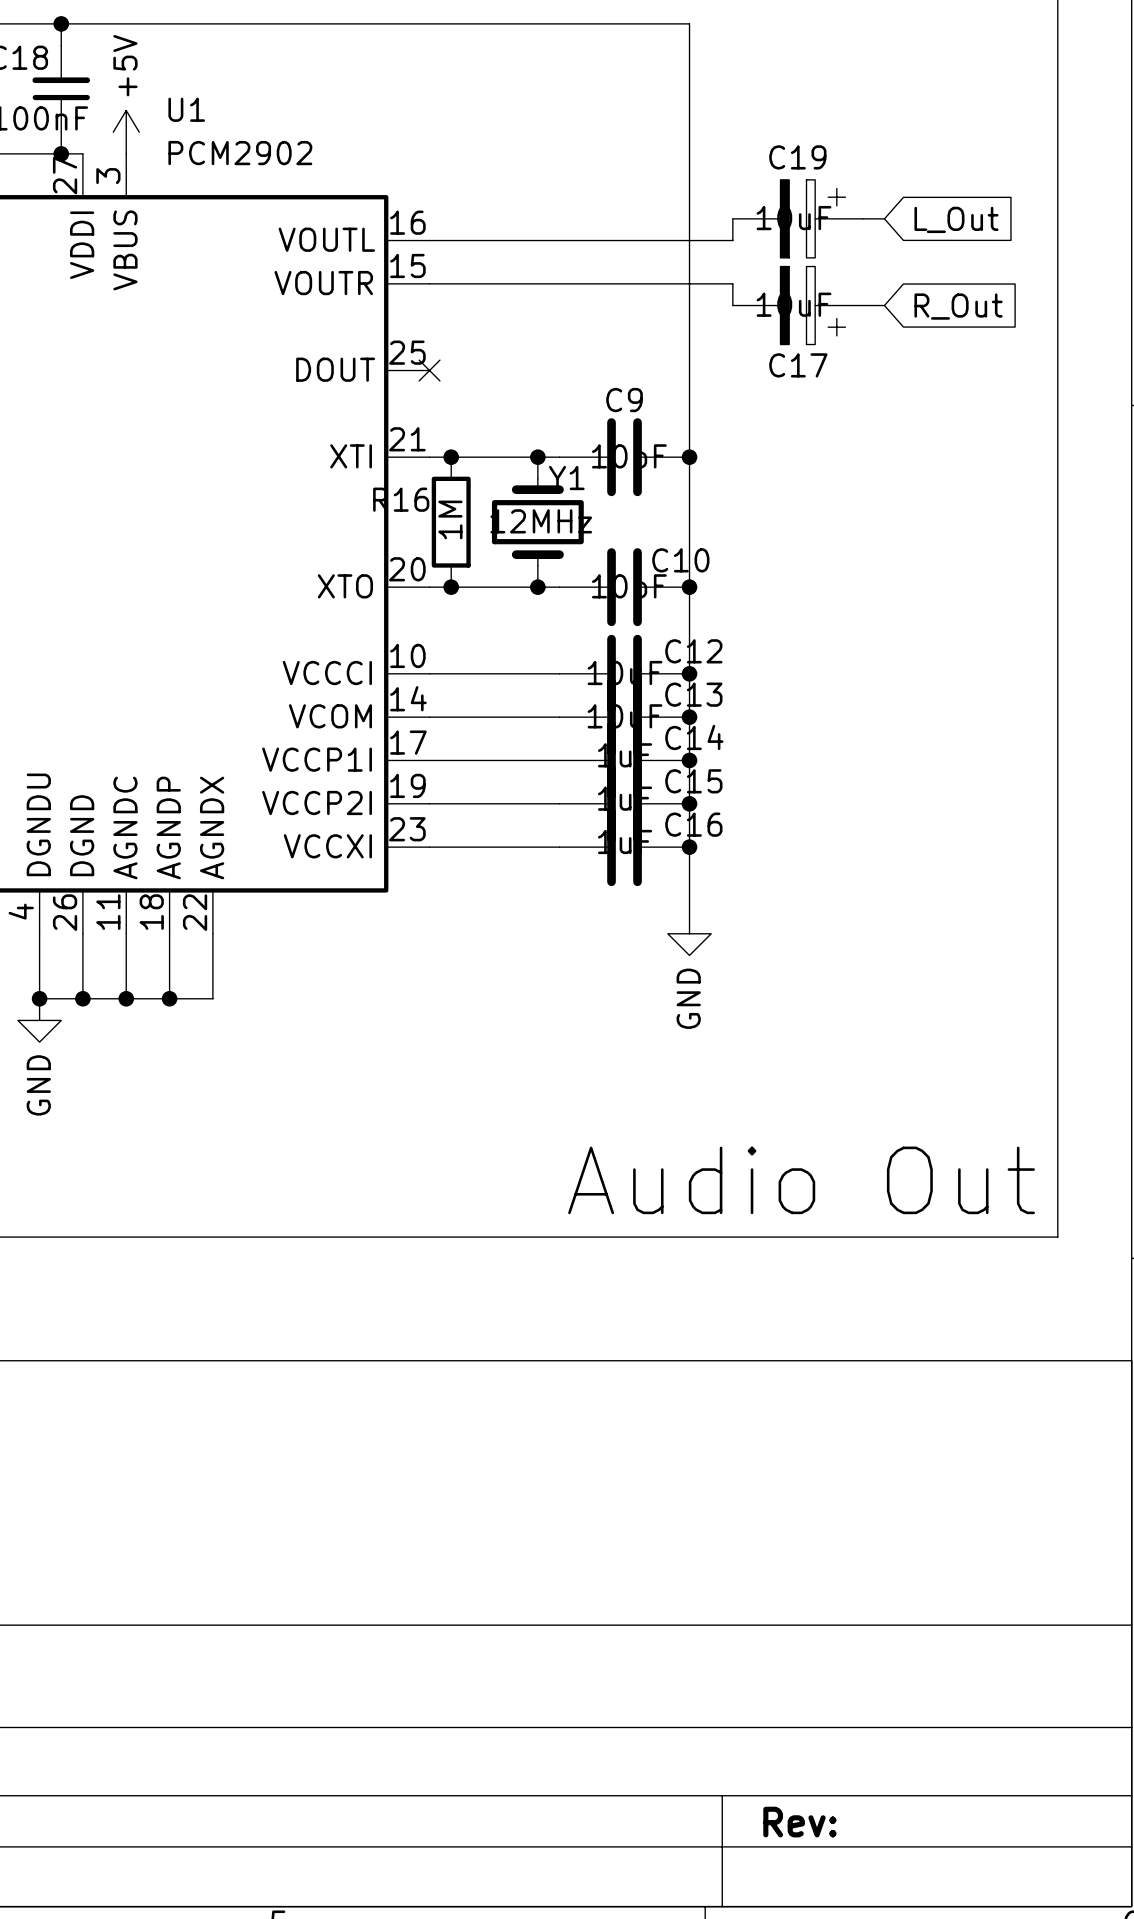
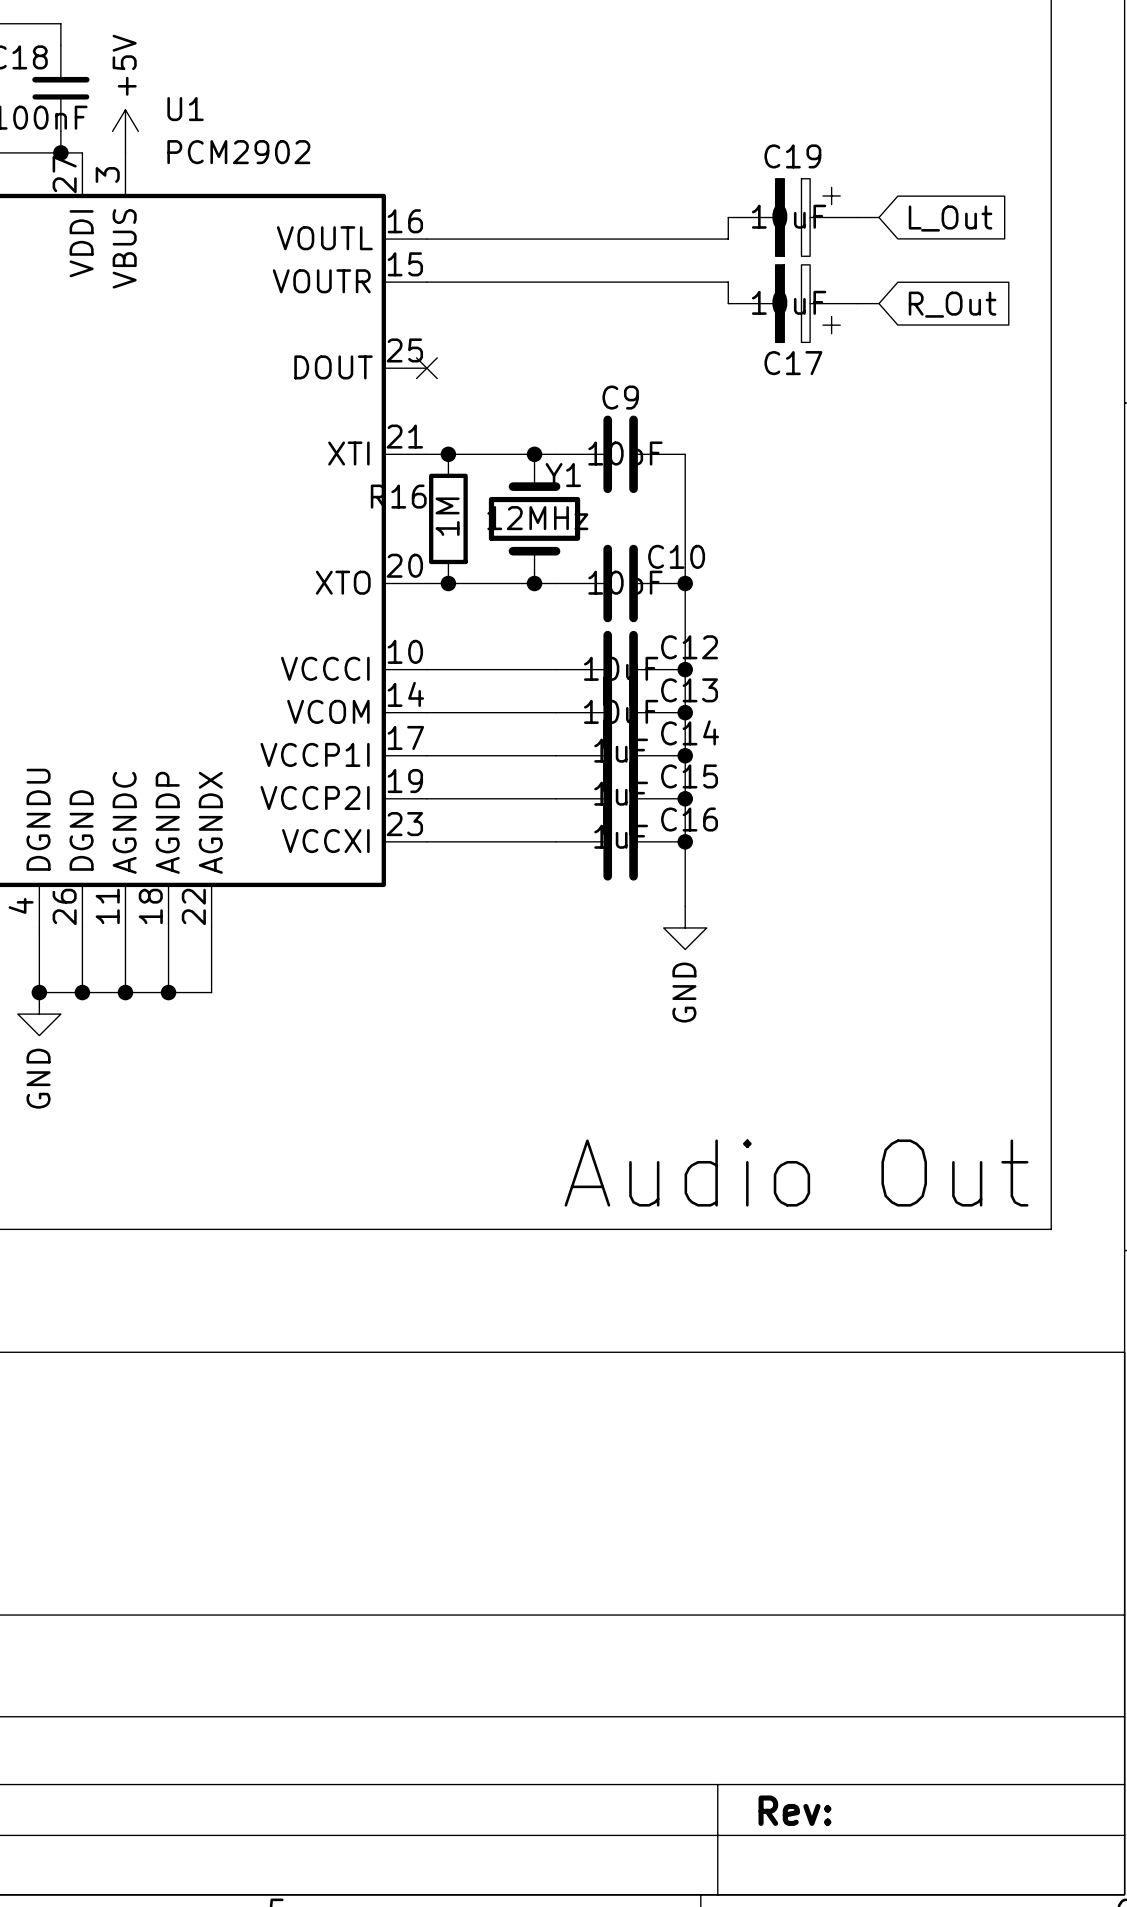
wire: (61, 23) (689, 23) (689, 457) -> none
junction: (61, 23) -> none
junction: (689, 457) -> none

